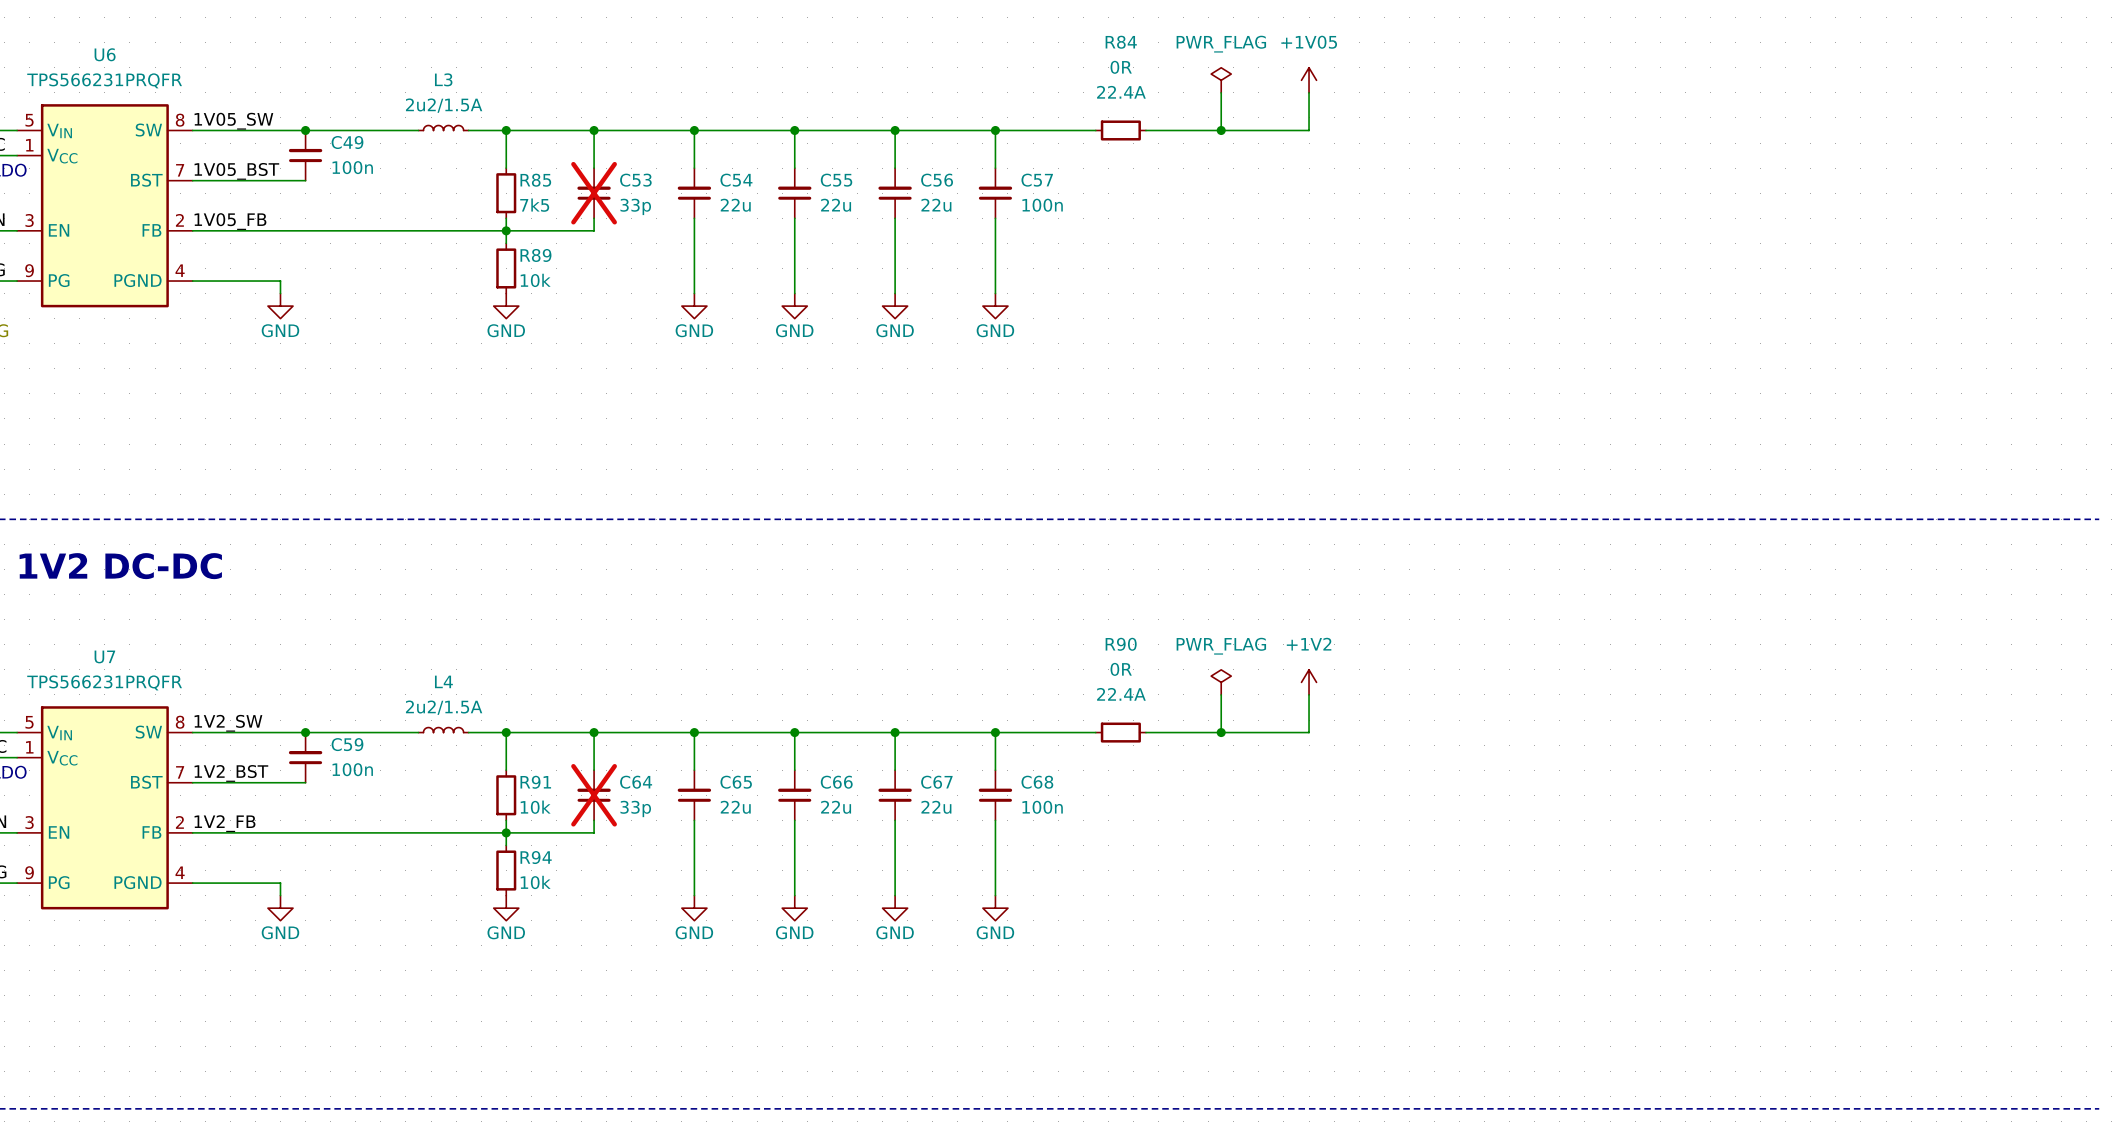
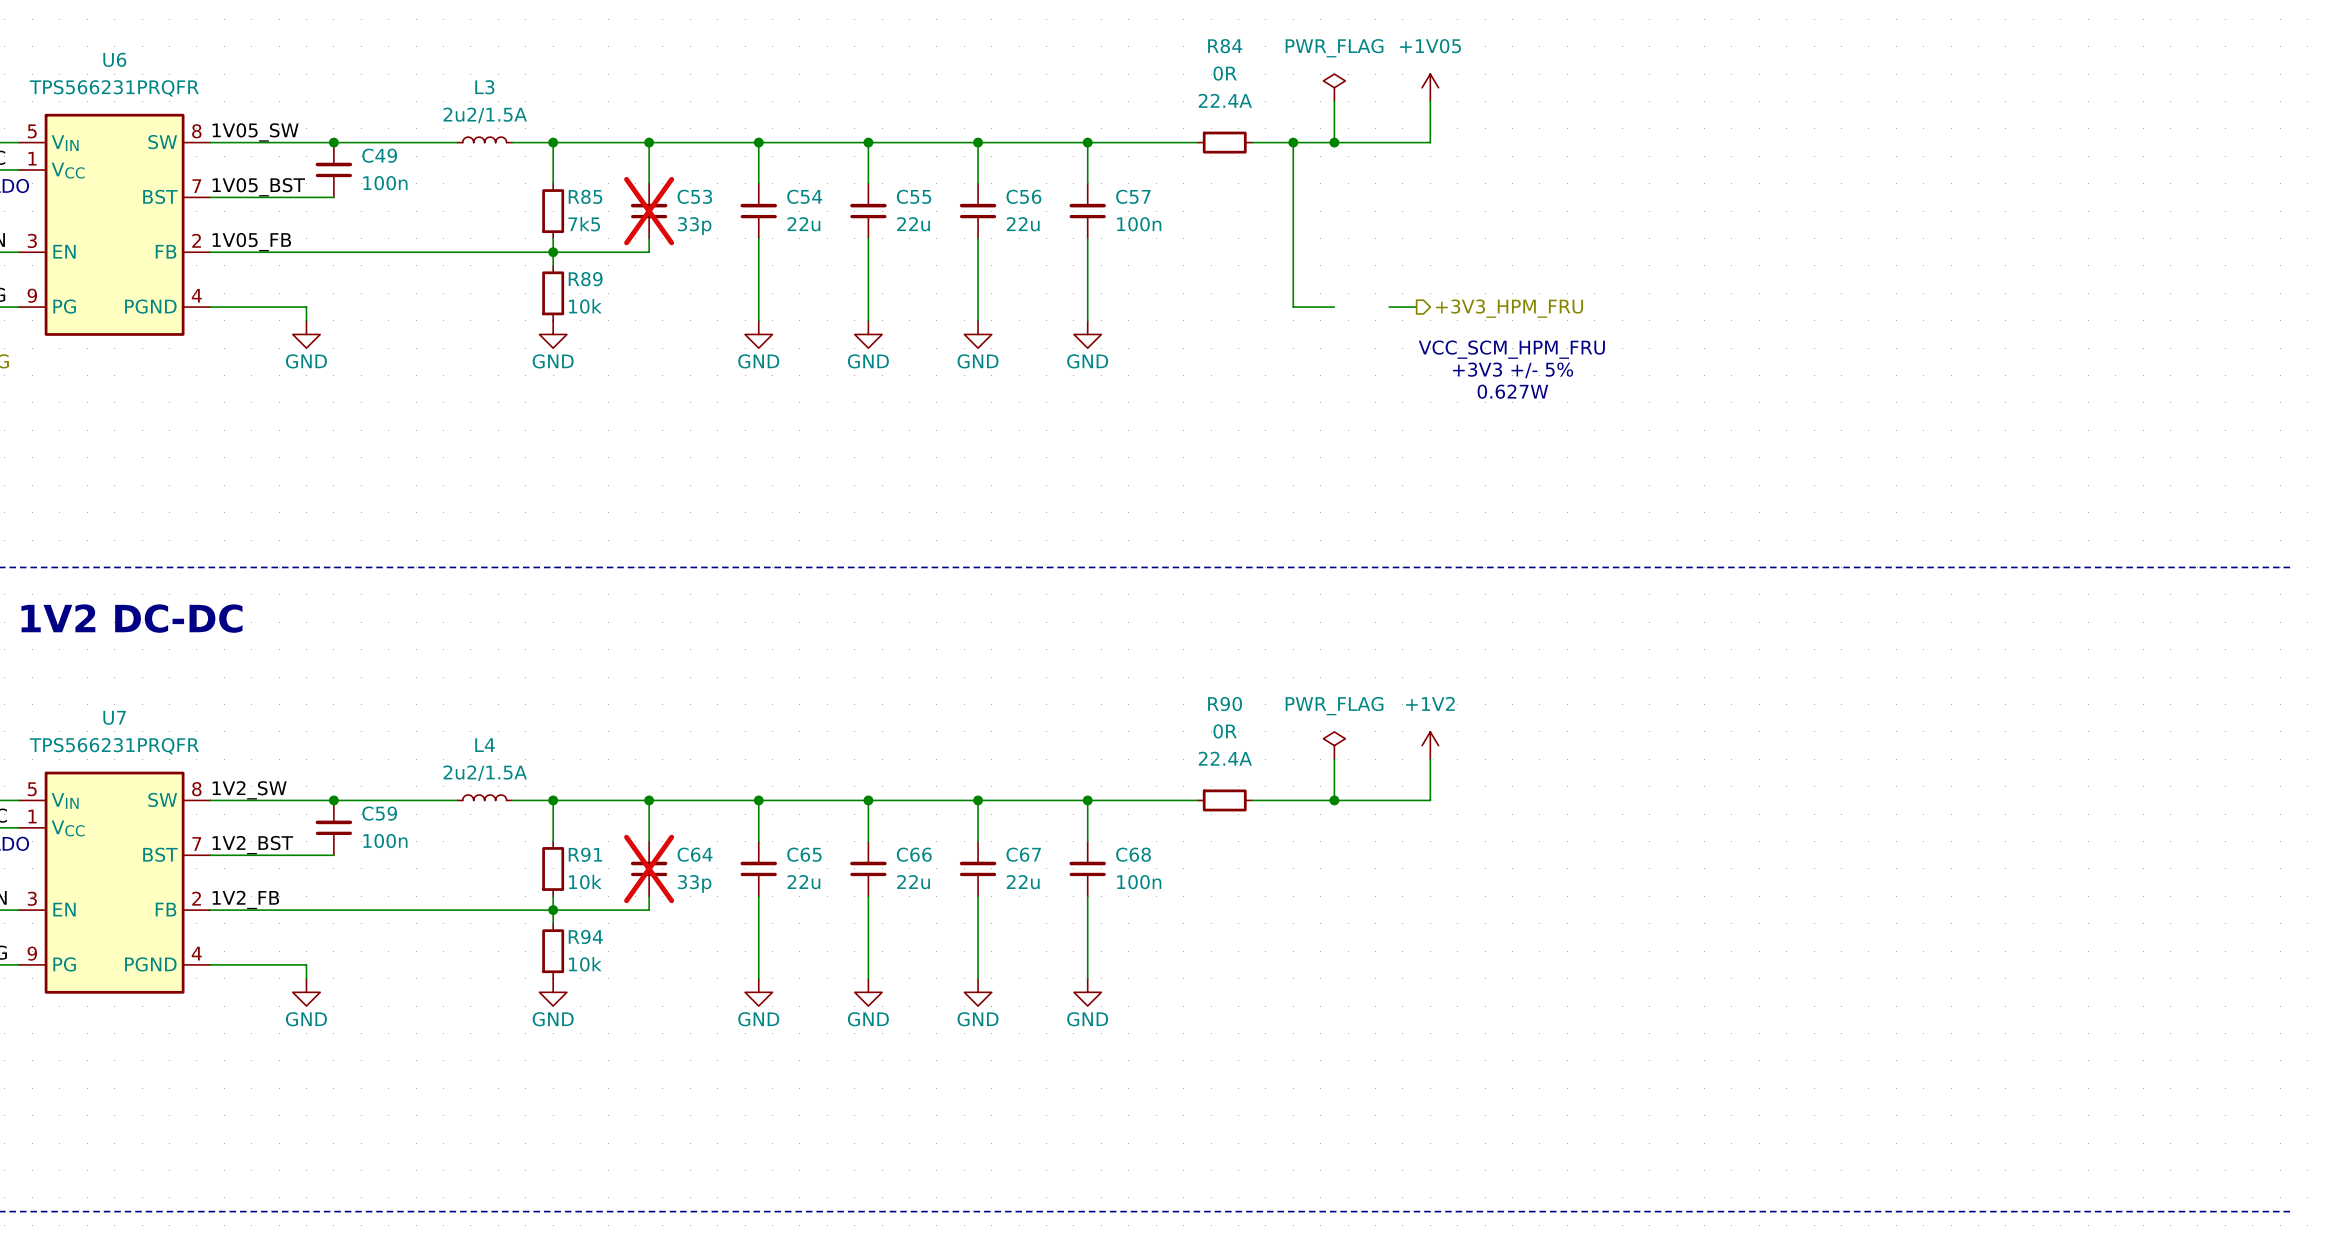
wire: none -> (1293, 142) (1293, 307) (1334, 307)
junction: none -> (1293, 142)
wire: none -> (1389, 307) (1416, 307)
hierarchical label: none -> +3V3_HPM_FRU (1509, 308)
text: none -> VCC_SCM_HPM_FRU (1511, 349)
text: none -> +3V3 +/- 5% (1513, 370)
text: none -> 0.627W (1512, 391)

